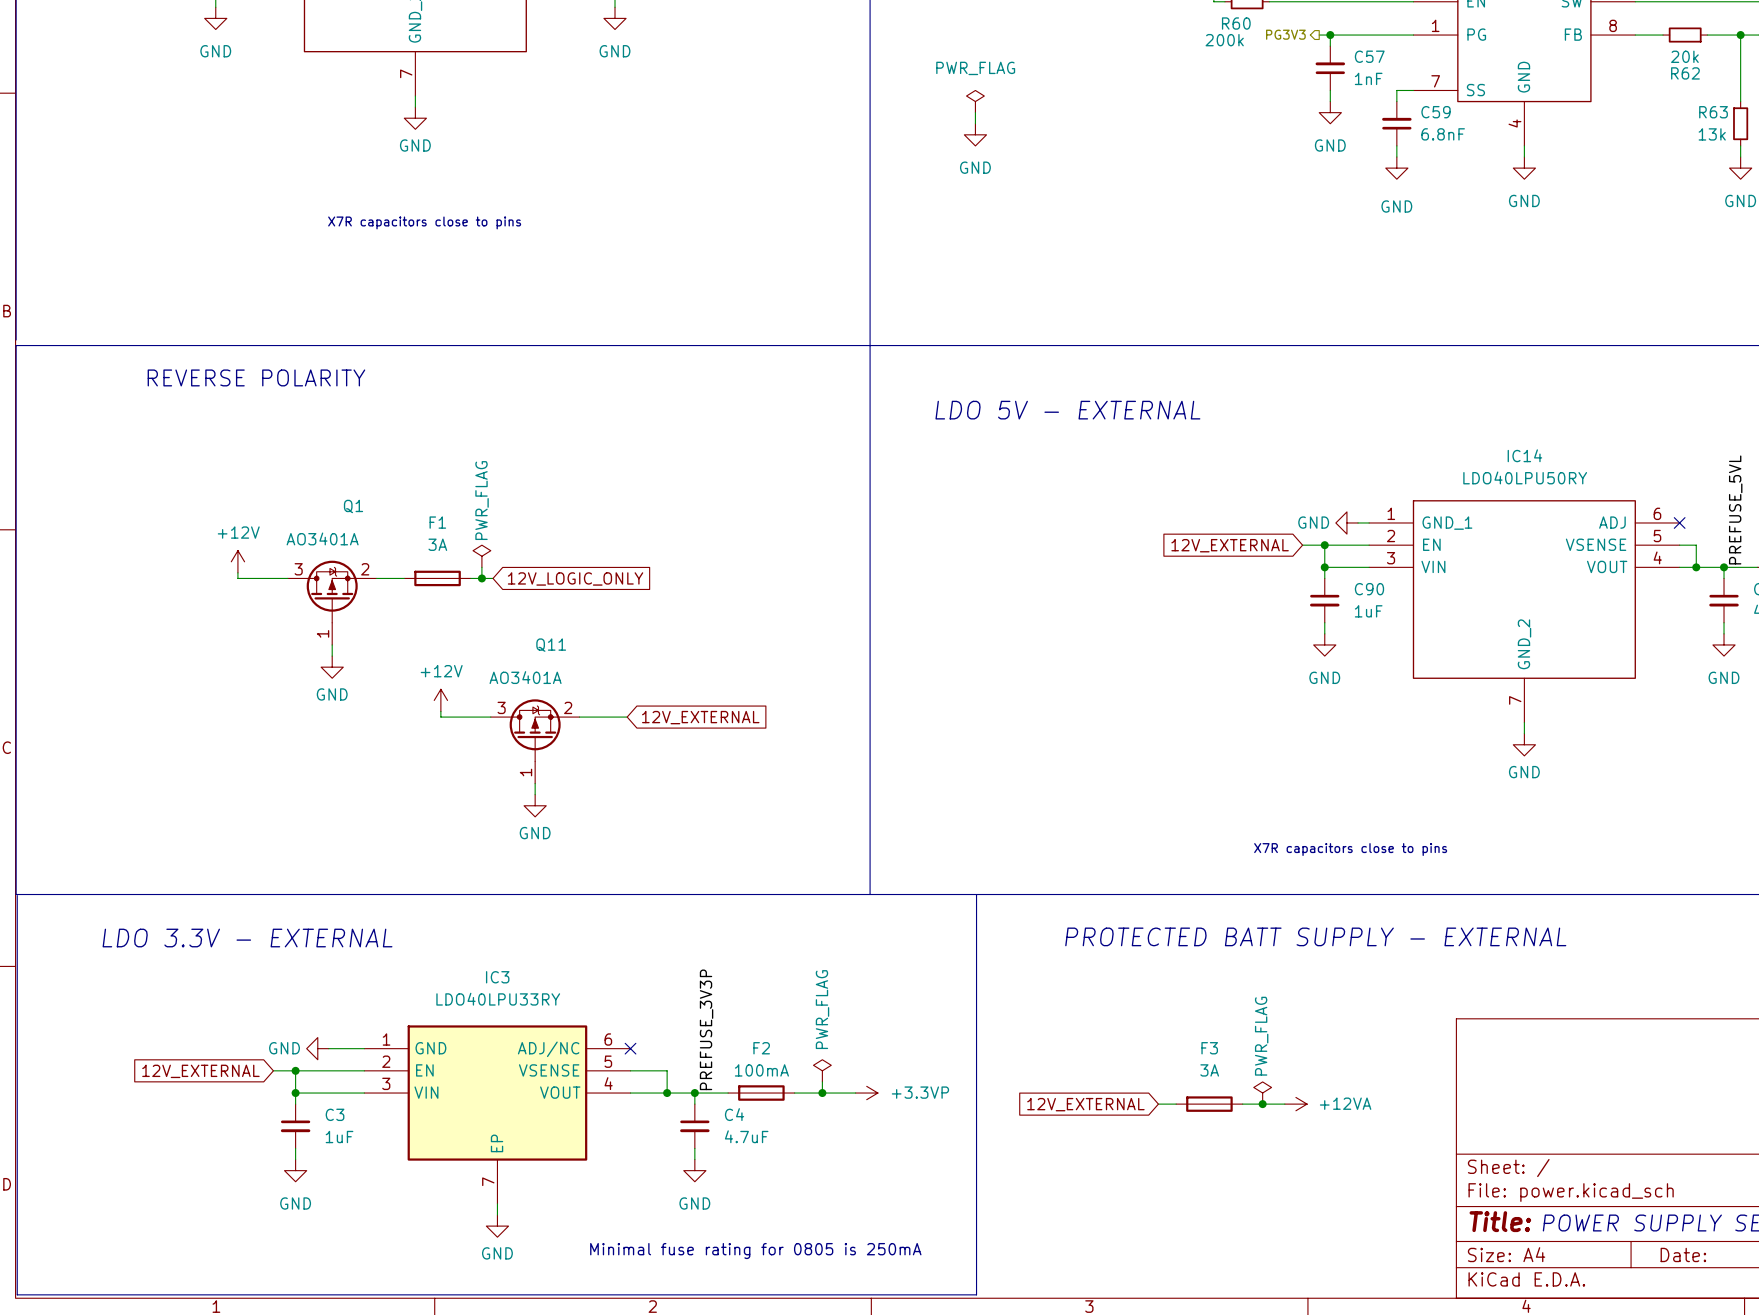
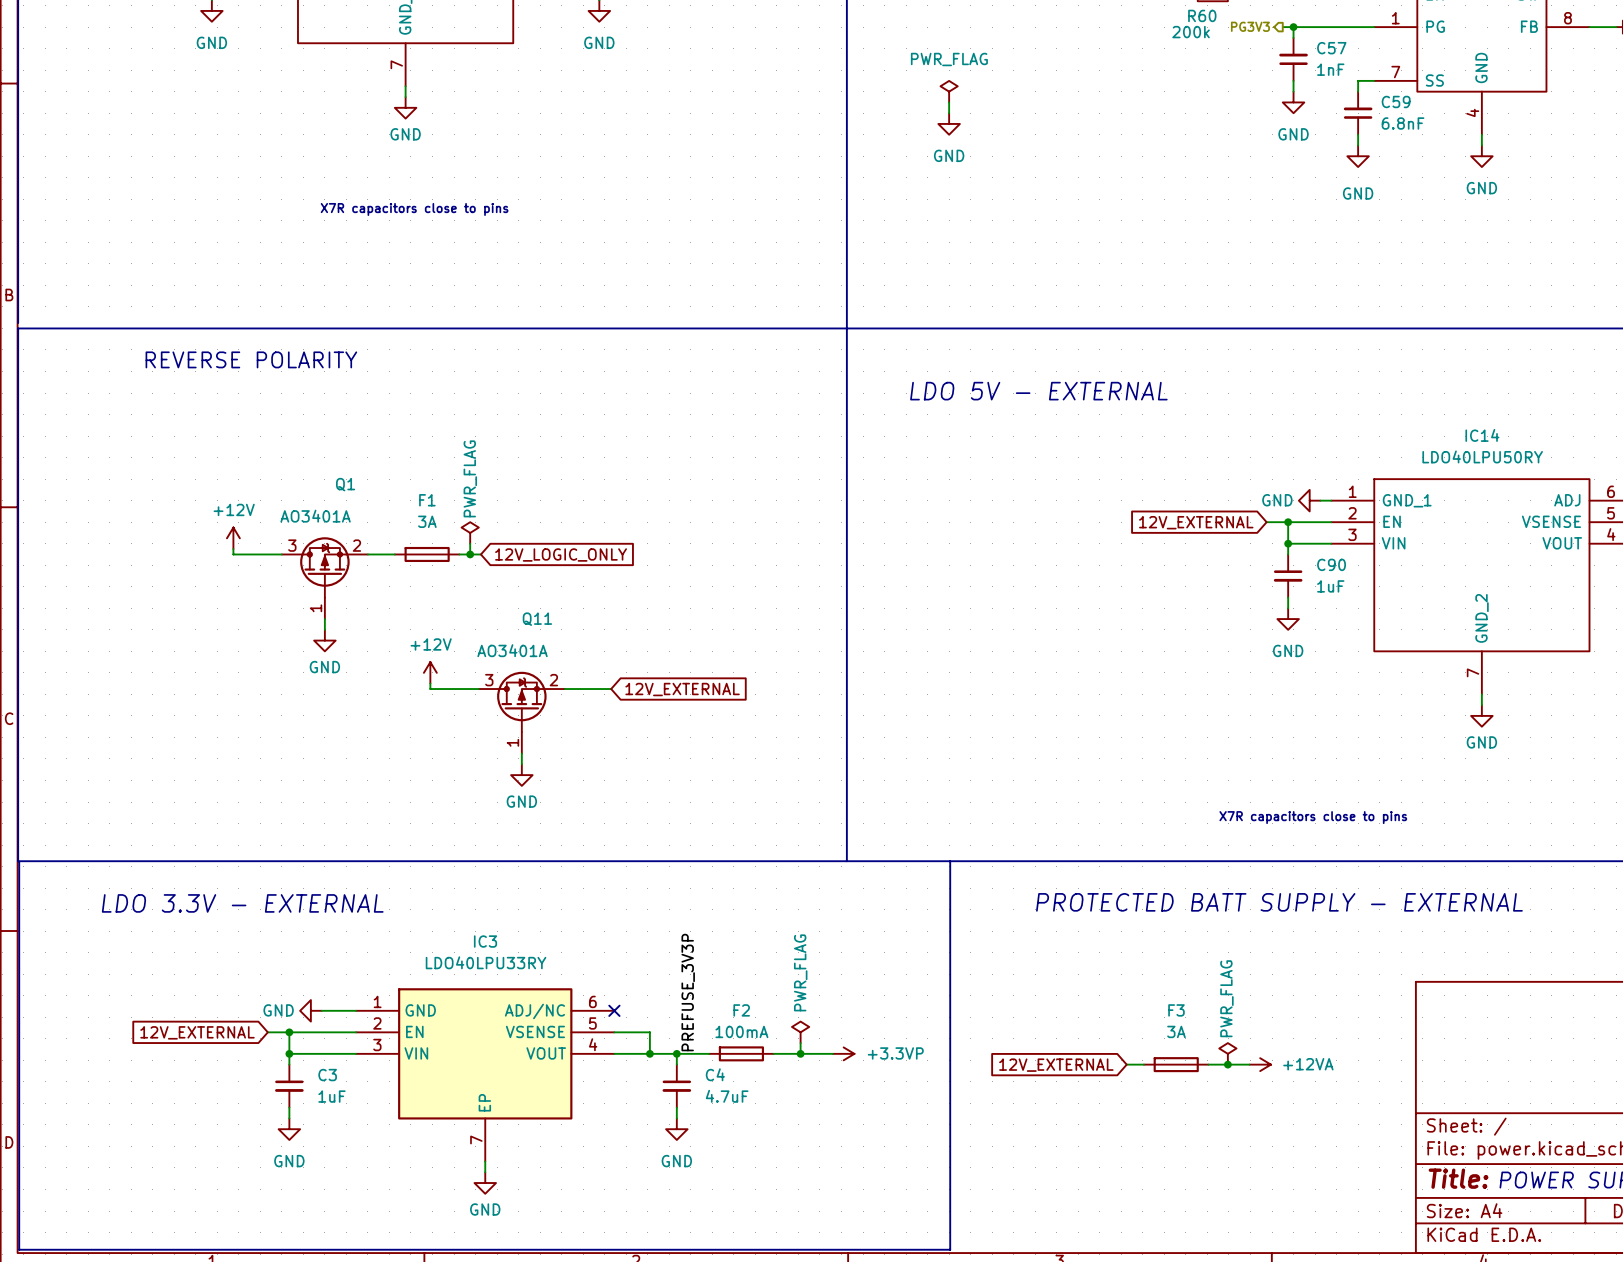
text: Minimal fuse rating for 0805 is 250mA (755, 1251) -> none

